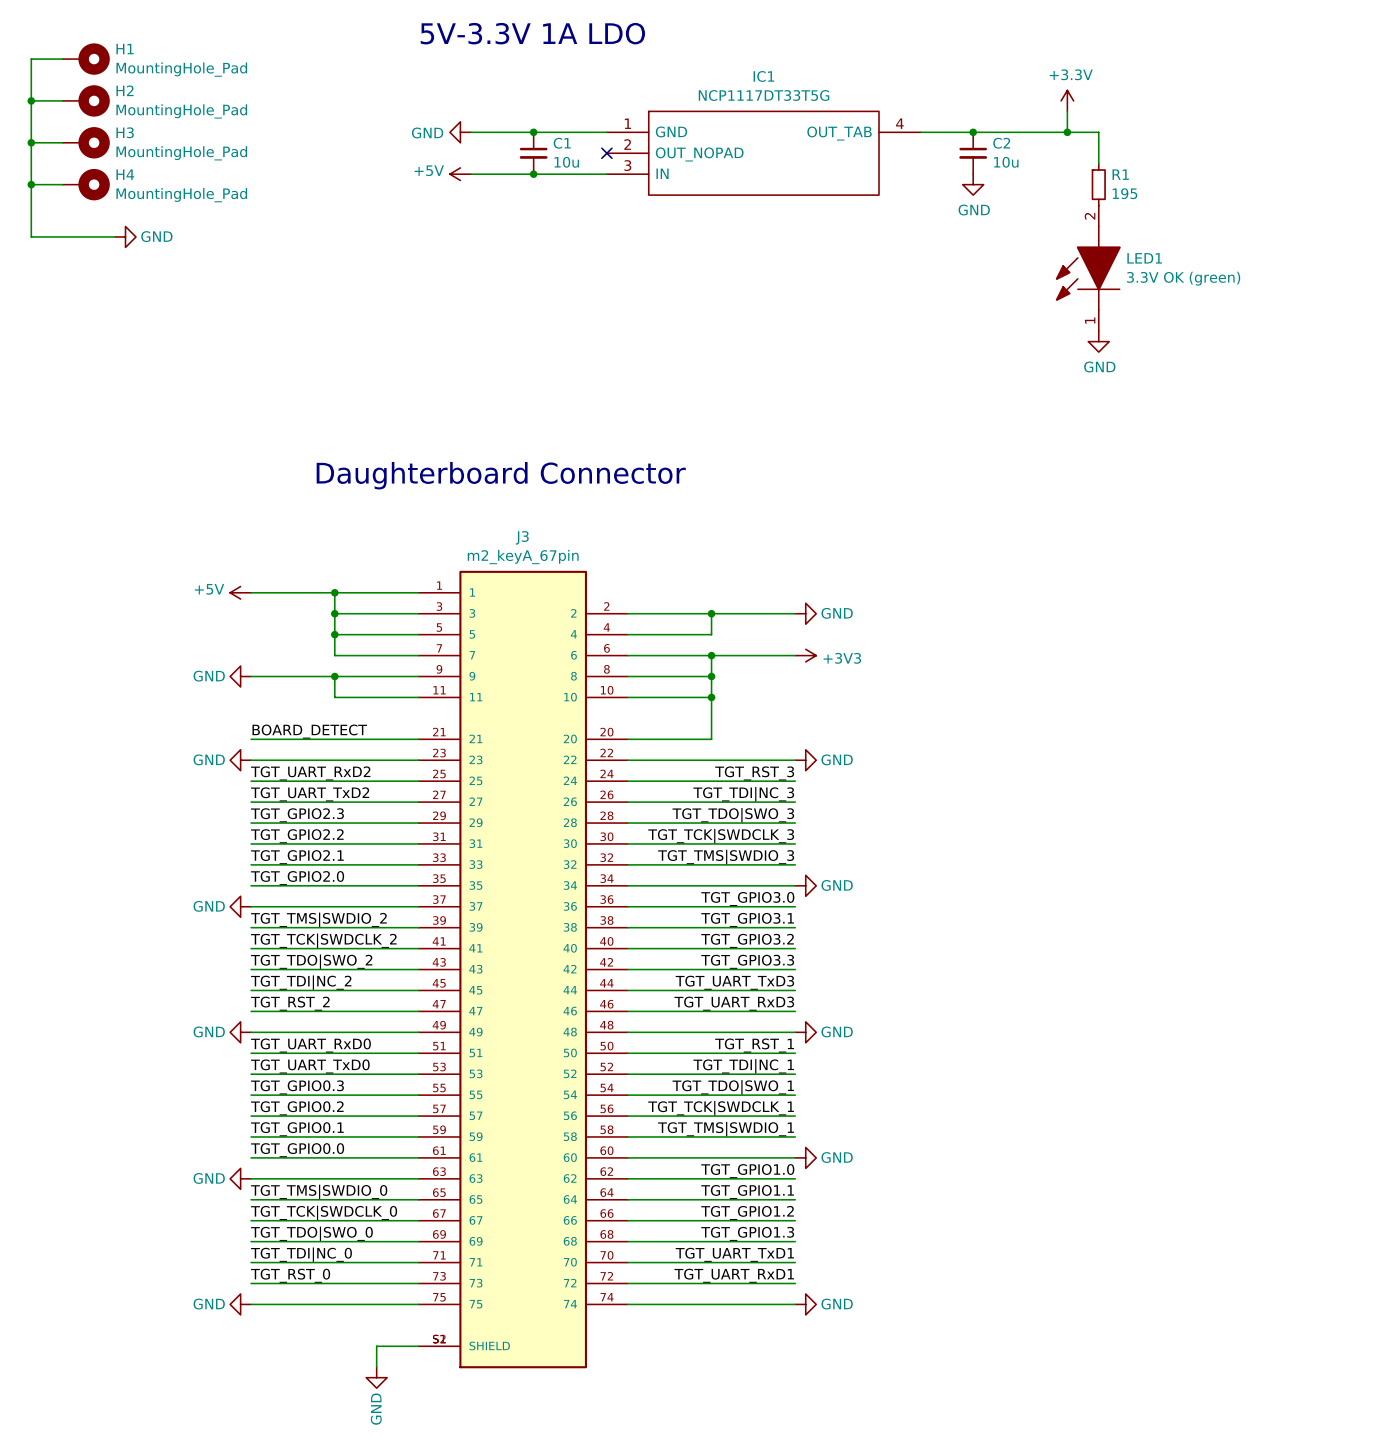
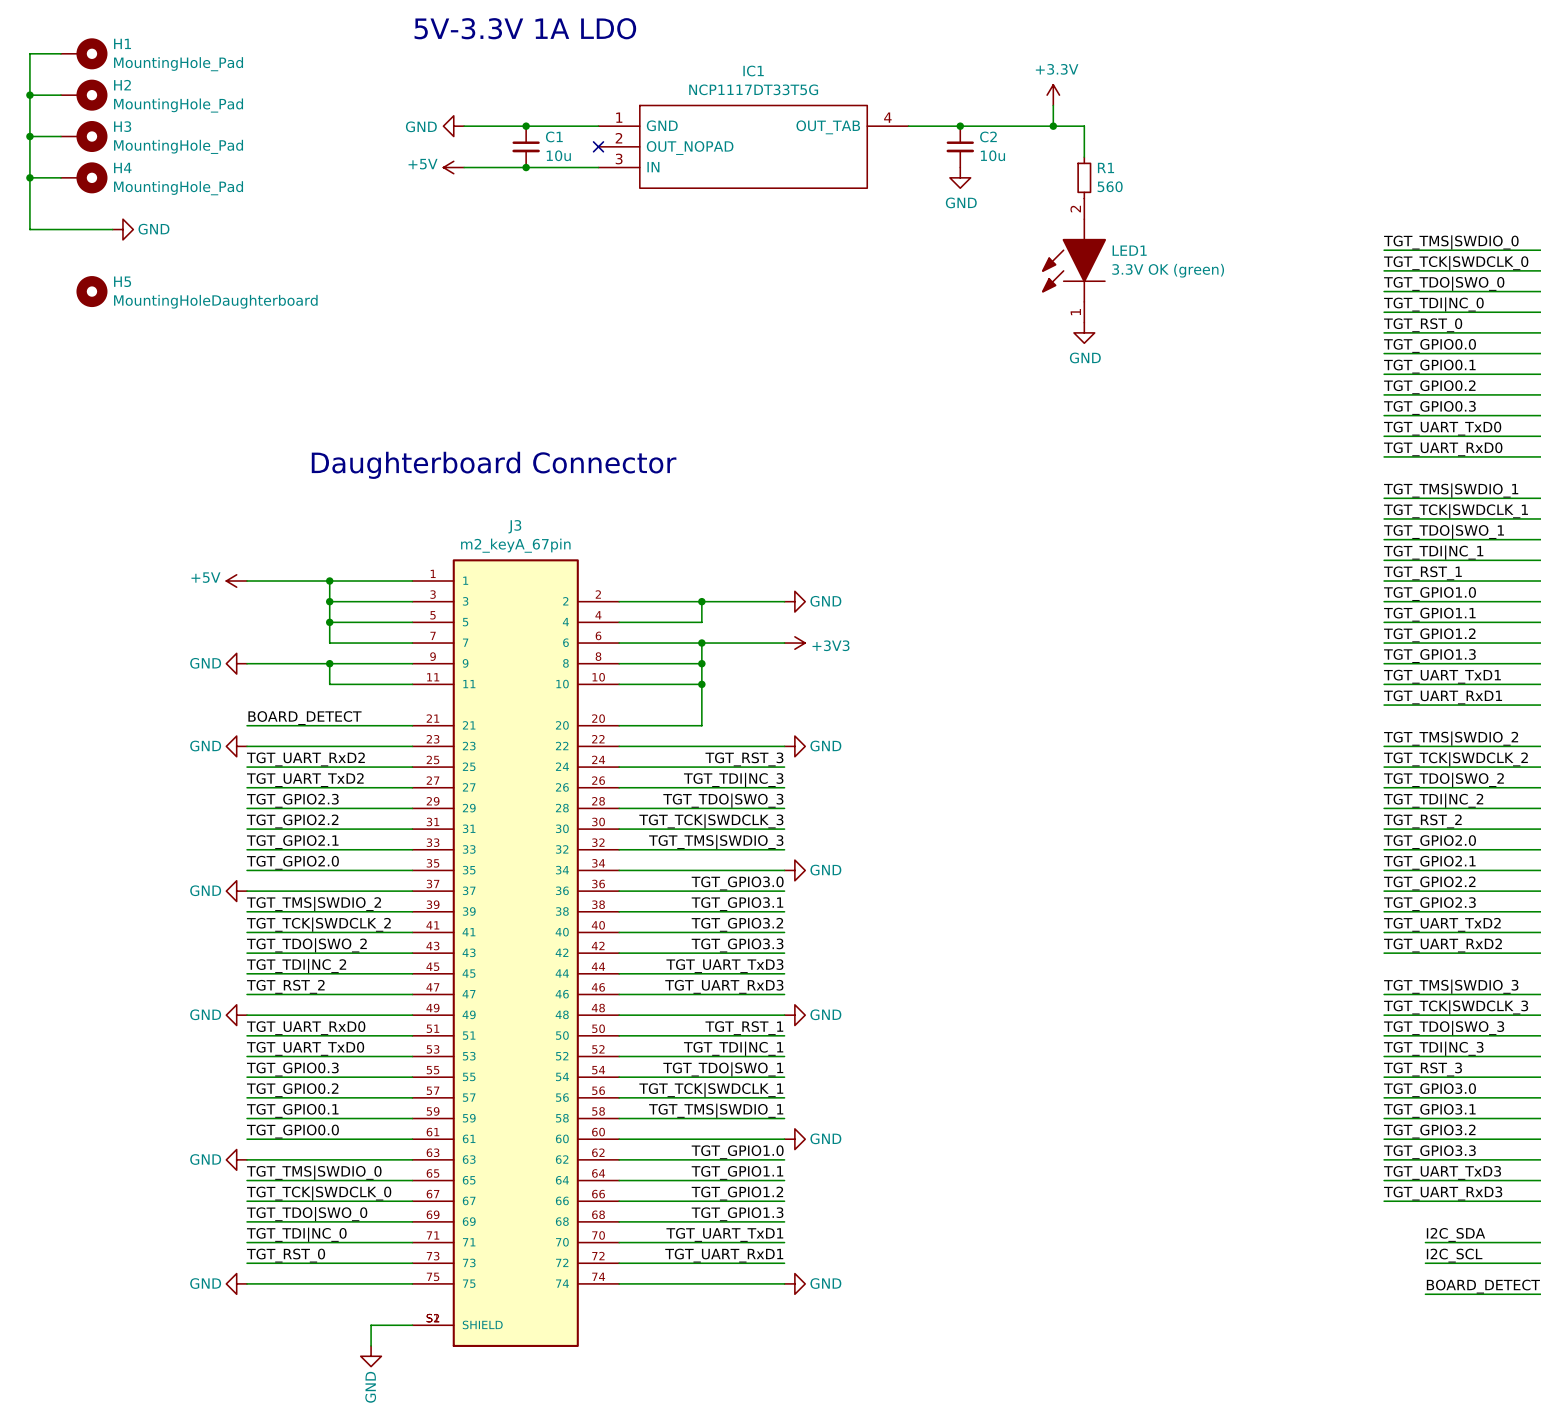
R1 value: 195 (1124, 193) -> 560 (1110, 186)
H5: none -> MountingHoleDaughterboard (91, 291)

